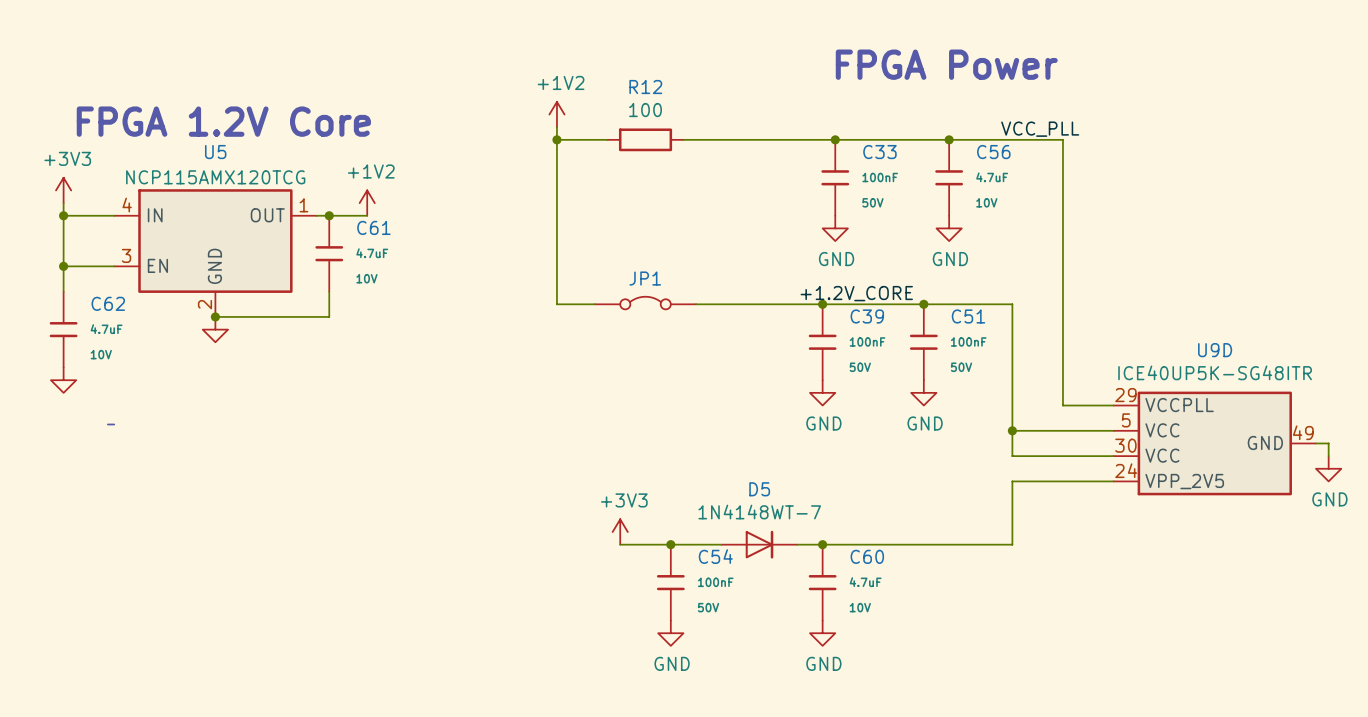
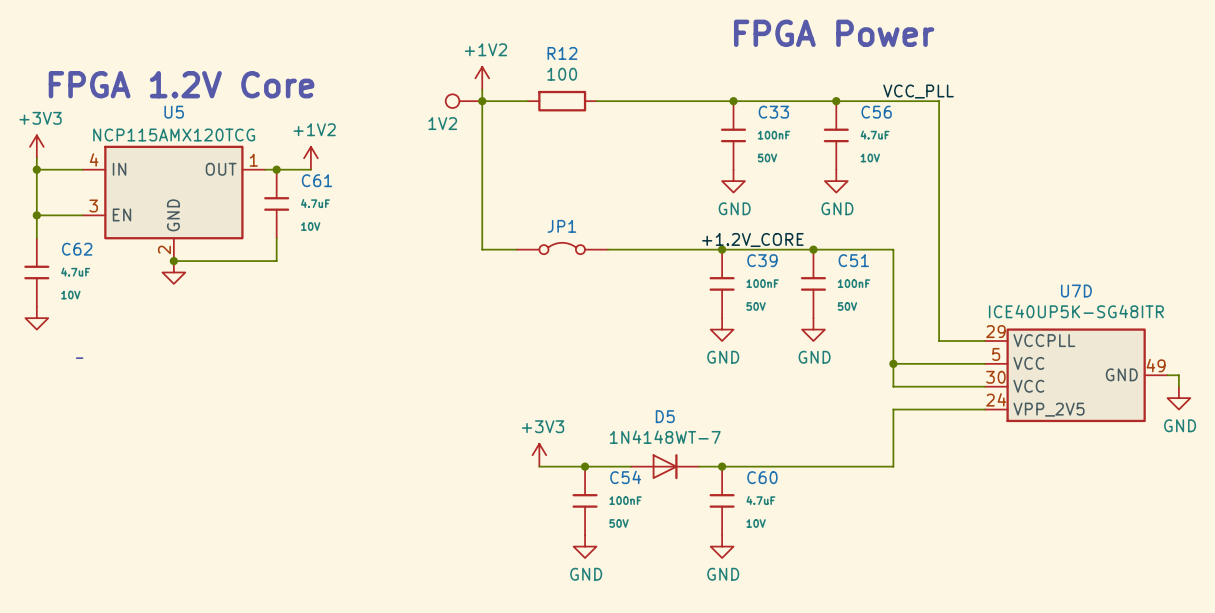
part: none -> 1V2 (463, 101)
U9D name: U9D (1215, 350) -> U7D (1076, 291)

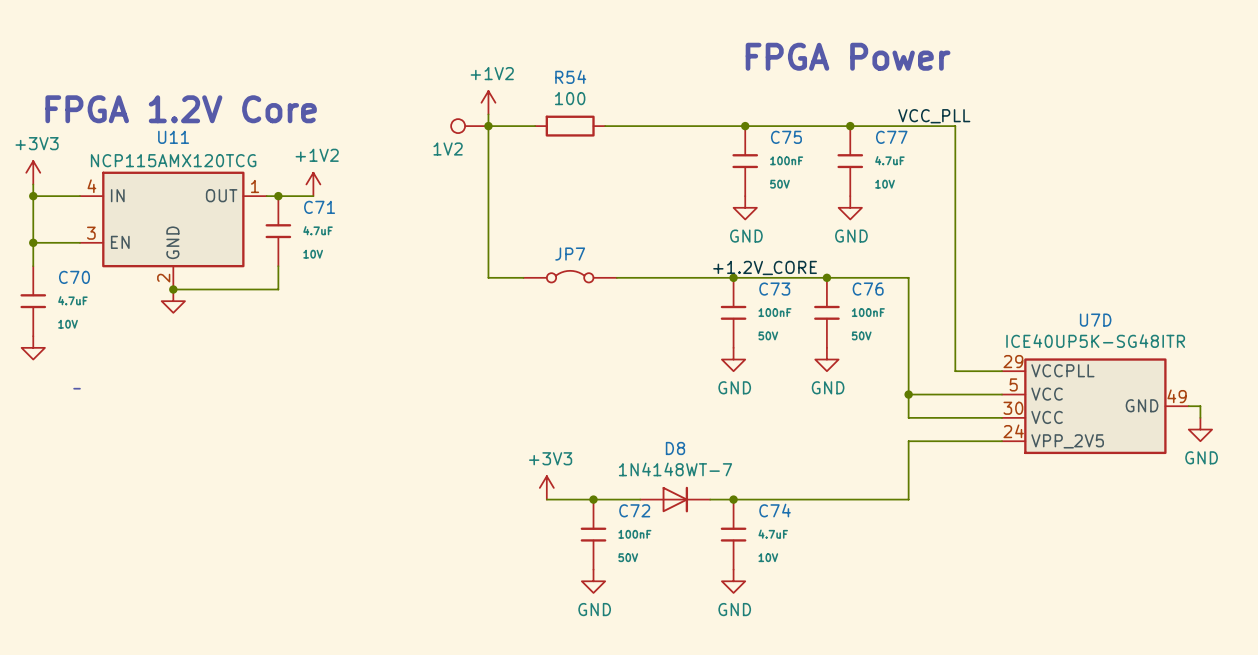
R12 name: R12 (562, 53) -> R54 (570, 77)
U5 name: U5 (174, 112) -> U11 (173, 137)
C33 name: C33 (773, 112) -> C75 (786, 137)
C56 name: C56 (876, 112) -> C77 (891, 137)
C61 name: C61 (317, 180) -> C71 (319, 207)
JP1 name: JP1 (561, 226) -> JP7 (570, 254)
C62 name: C62 (77, 249) -> C70 (74, 277)
C39 name: C39 (762, 260) -> C73 (774, 289)
C51 name: C51 (853, 260) -> C76 (868, 289)
D5 name: D5 (665, 416) -> D8 (675, 448)
C54 name: C54 (625, 477) -> C72 (634, 510)
C60 name: C60 (762, 477) -> C74 (775, 510)

